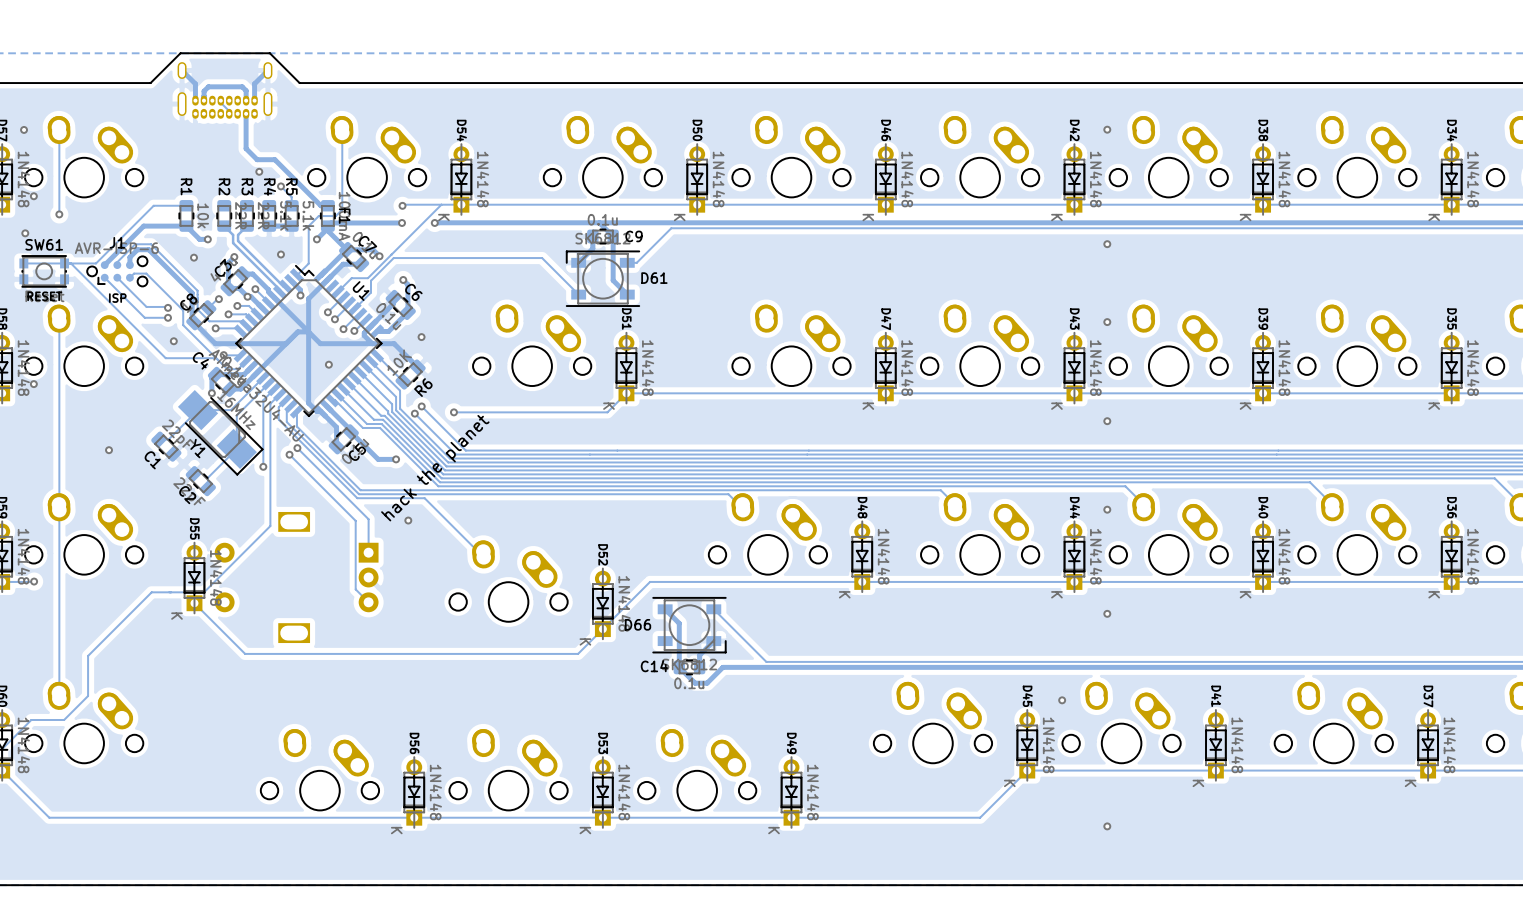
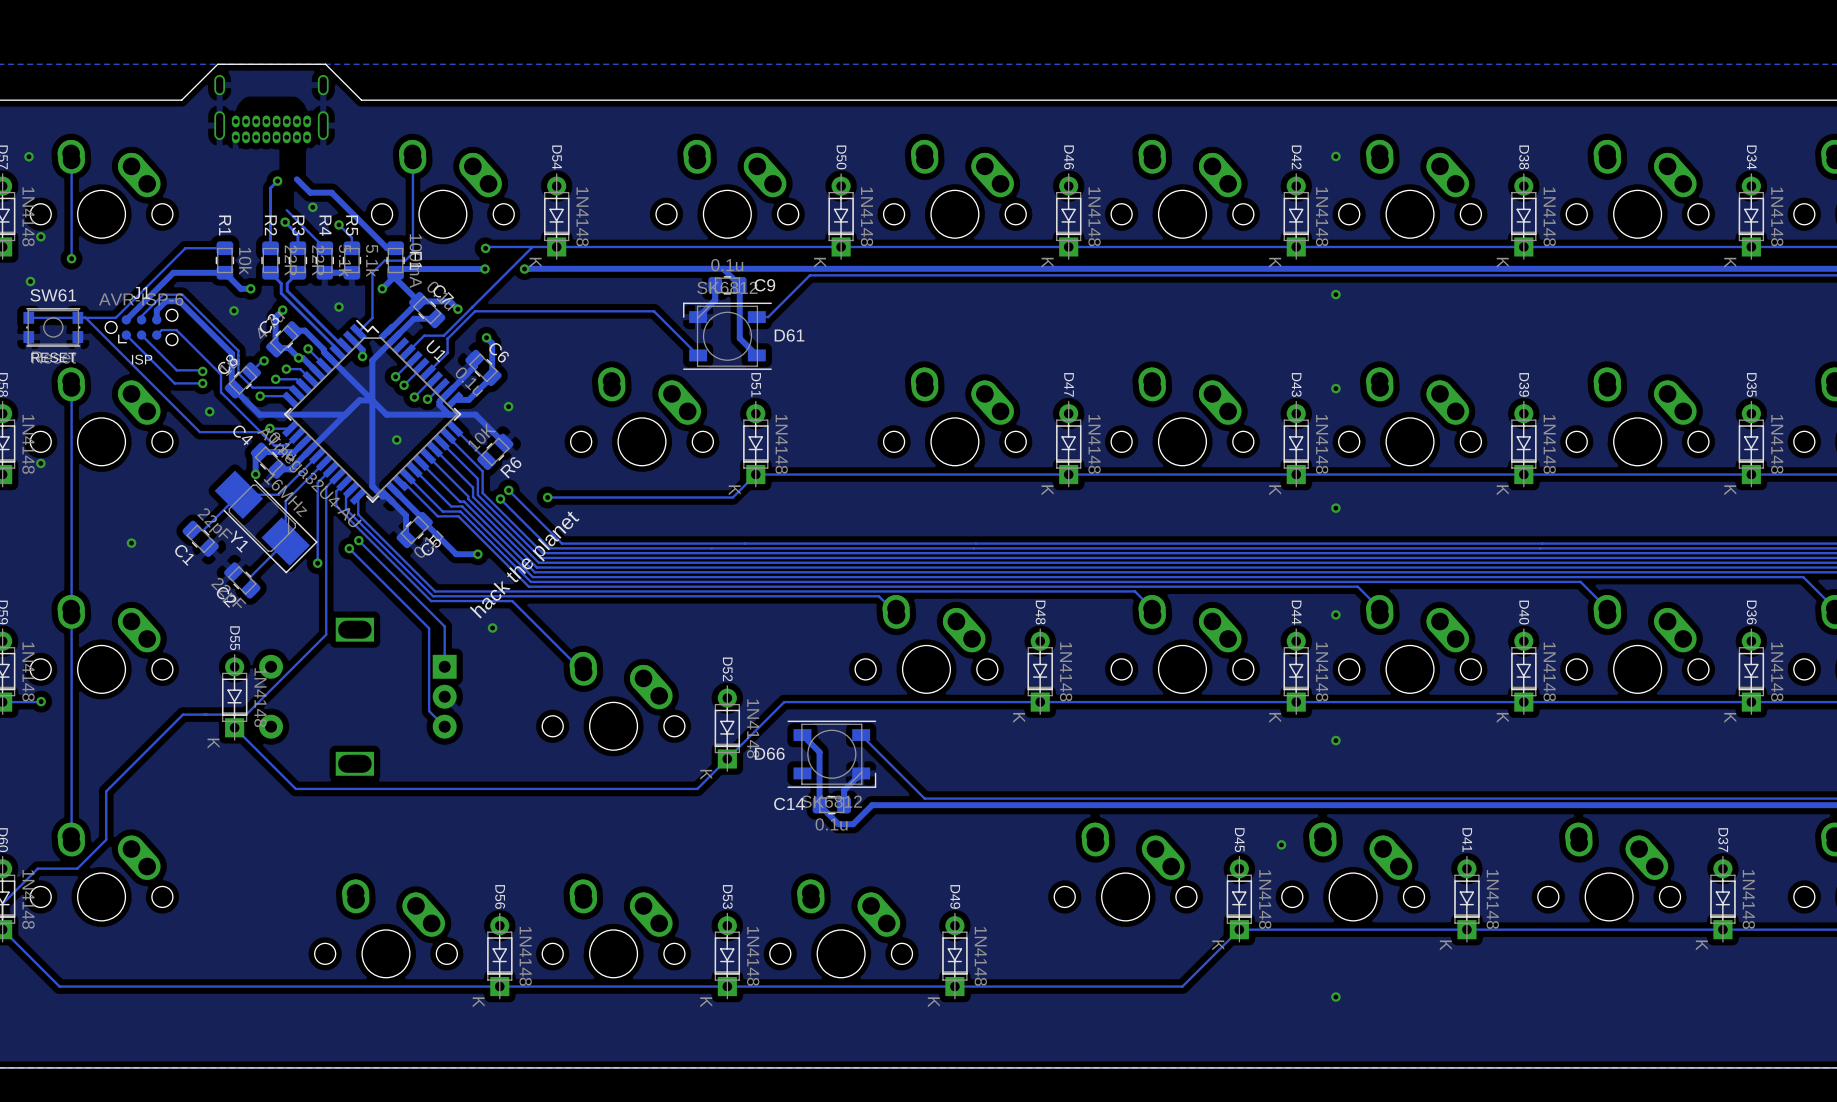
track: (182, 70) (195, 83) (195, 100) -> none
track: (267, 70) (254, 83) (254, 100) -> none
track: (204, 96) (204, 91) (208, 86) (242, 86) (246, 90) (246, 100) -> none
track: (220, 100) (229, 113) -> none
track: (246, 113) (246, 148) -> none
track: none -> (277, 181) (270, 188) (270, 248)
via: none -> (277, 181)
track: none -> (286, 210) (324, 248)
track: none -> (285, 222) (297, 234) (297, 248)
via: none -> (285, 222)

